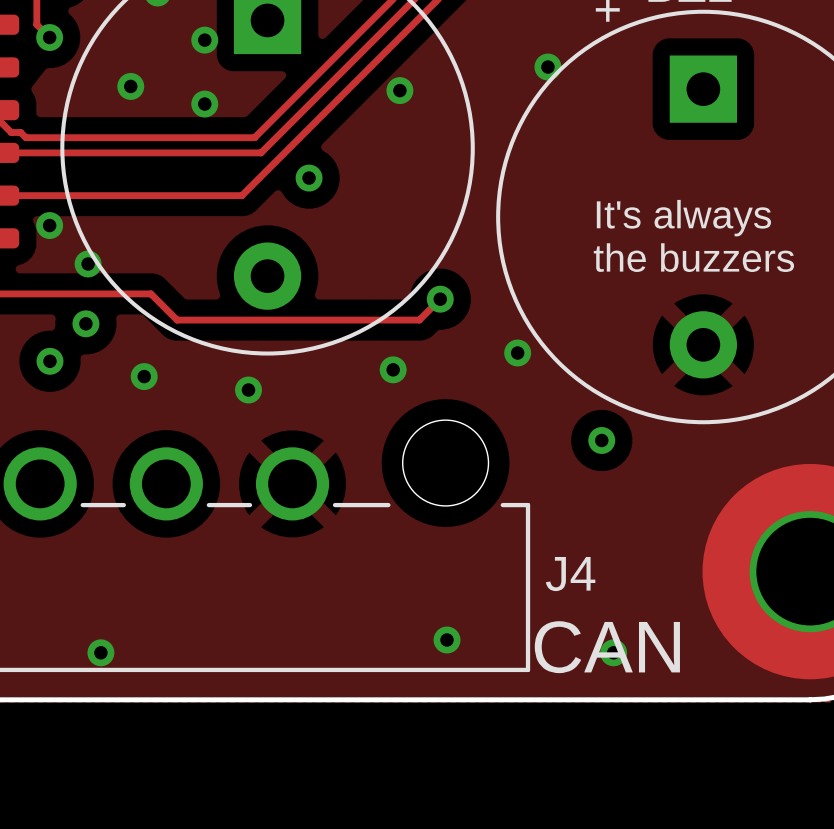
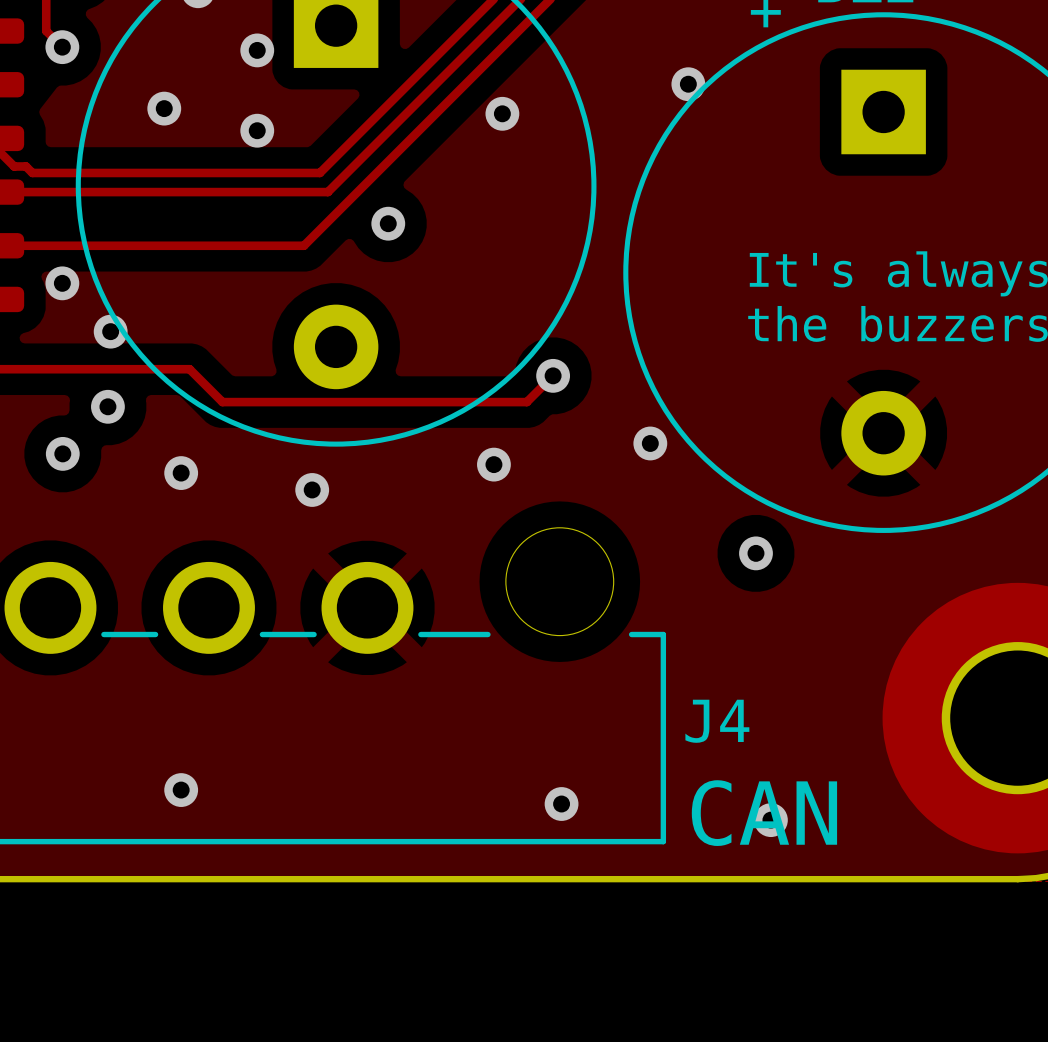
via position: (100, 652) -> (181, 790)

